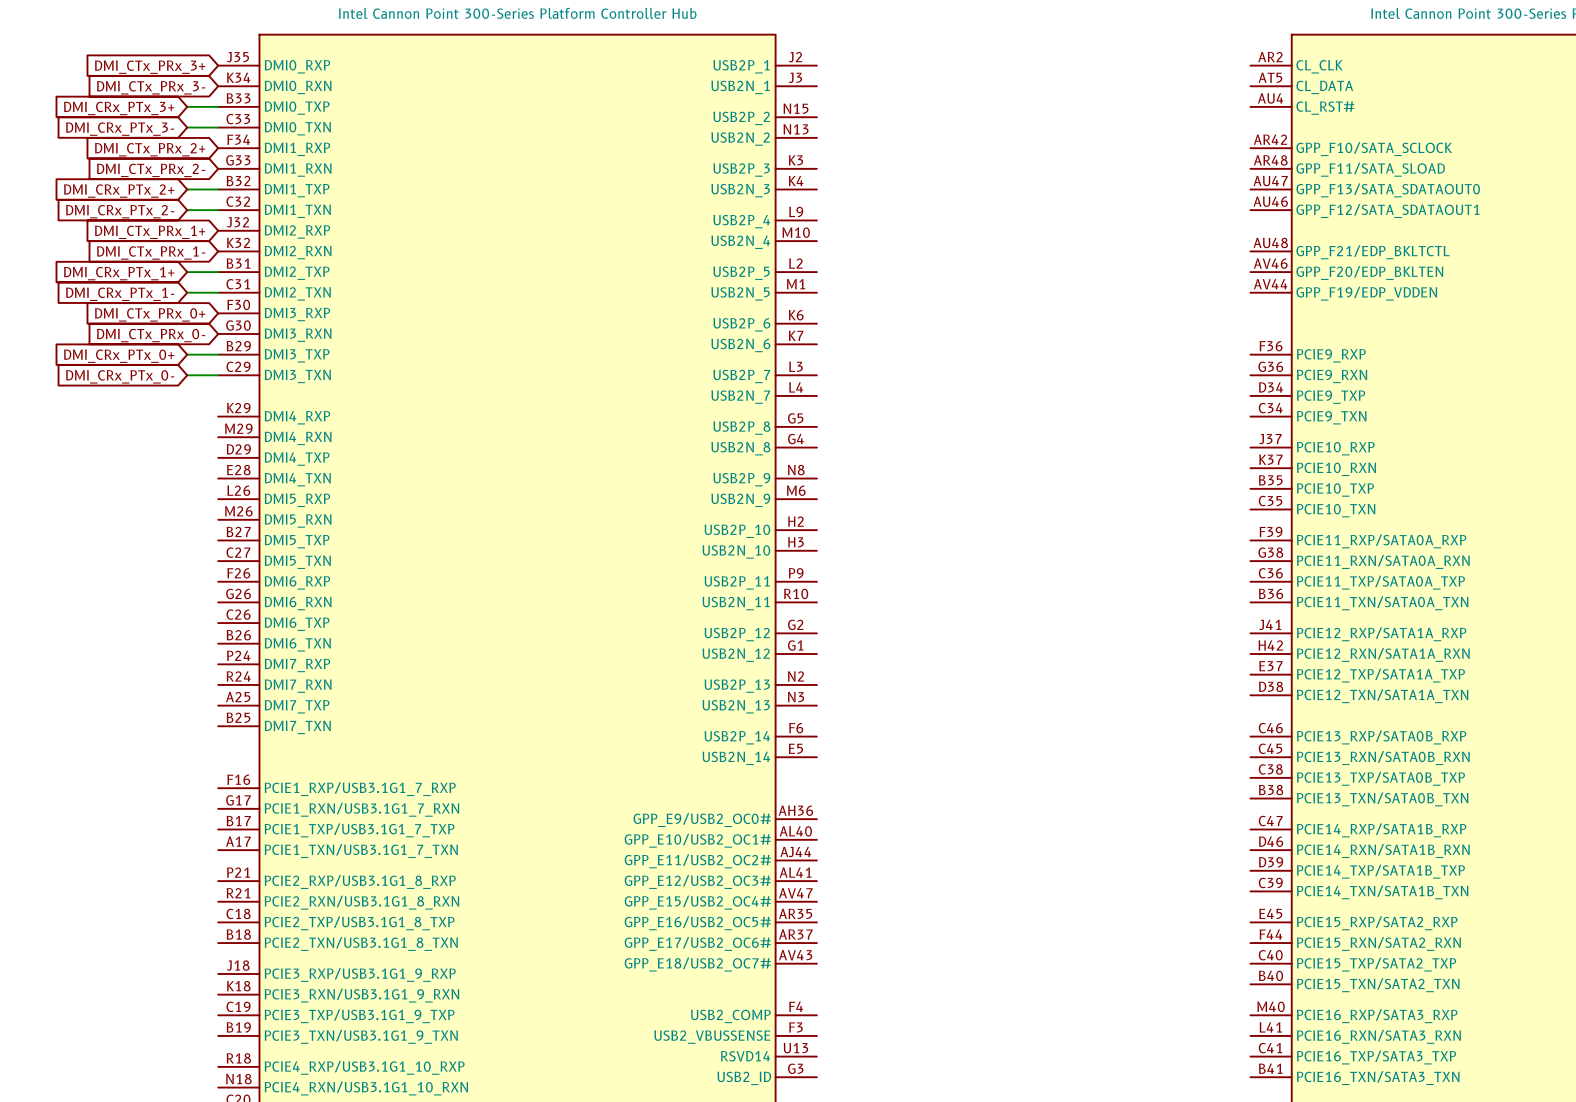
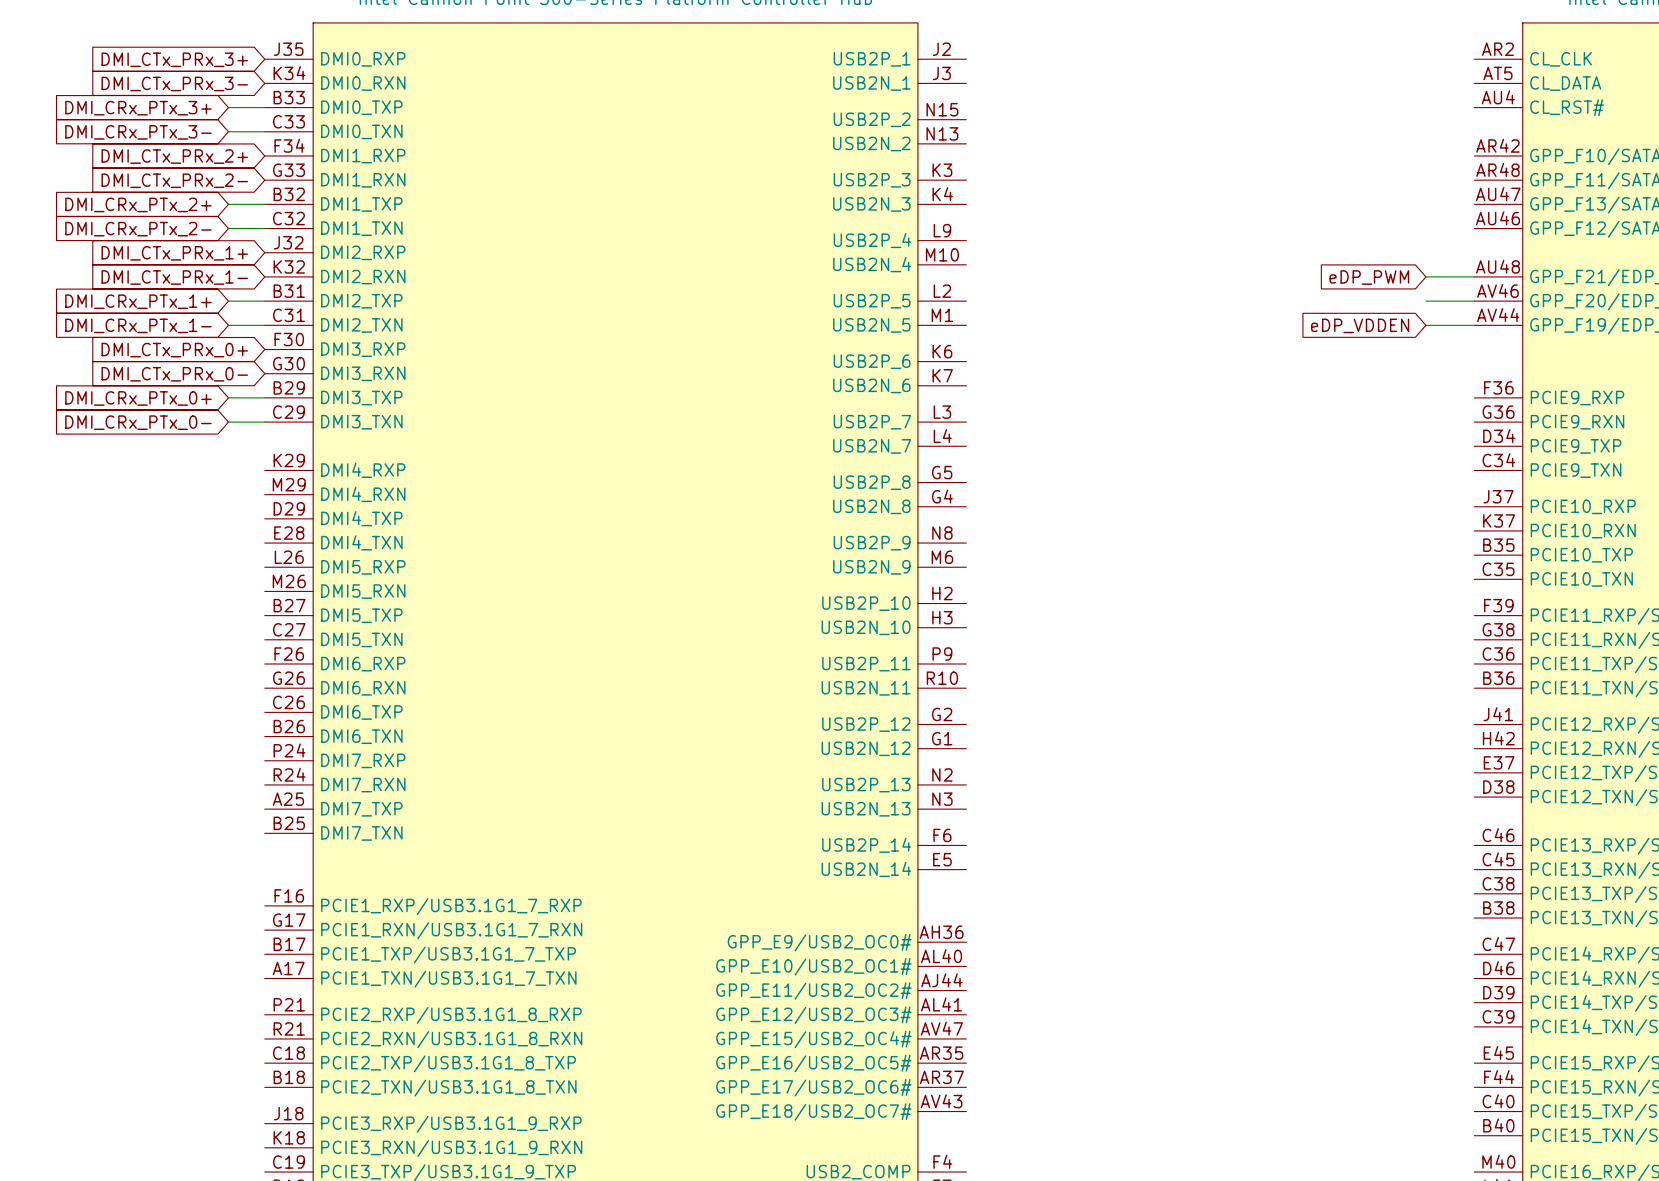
wire: none -> (1425, 276) (1474, 276)
global label: none -> eDP_PWM (1369, 277)
wire: none -> (1425, 301) (1474, 301)
wire: none -> (1425, 325) (1474, 325)
global label: none -> eDP_VDDEN (1360, 325)

